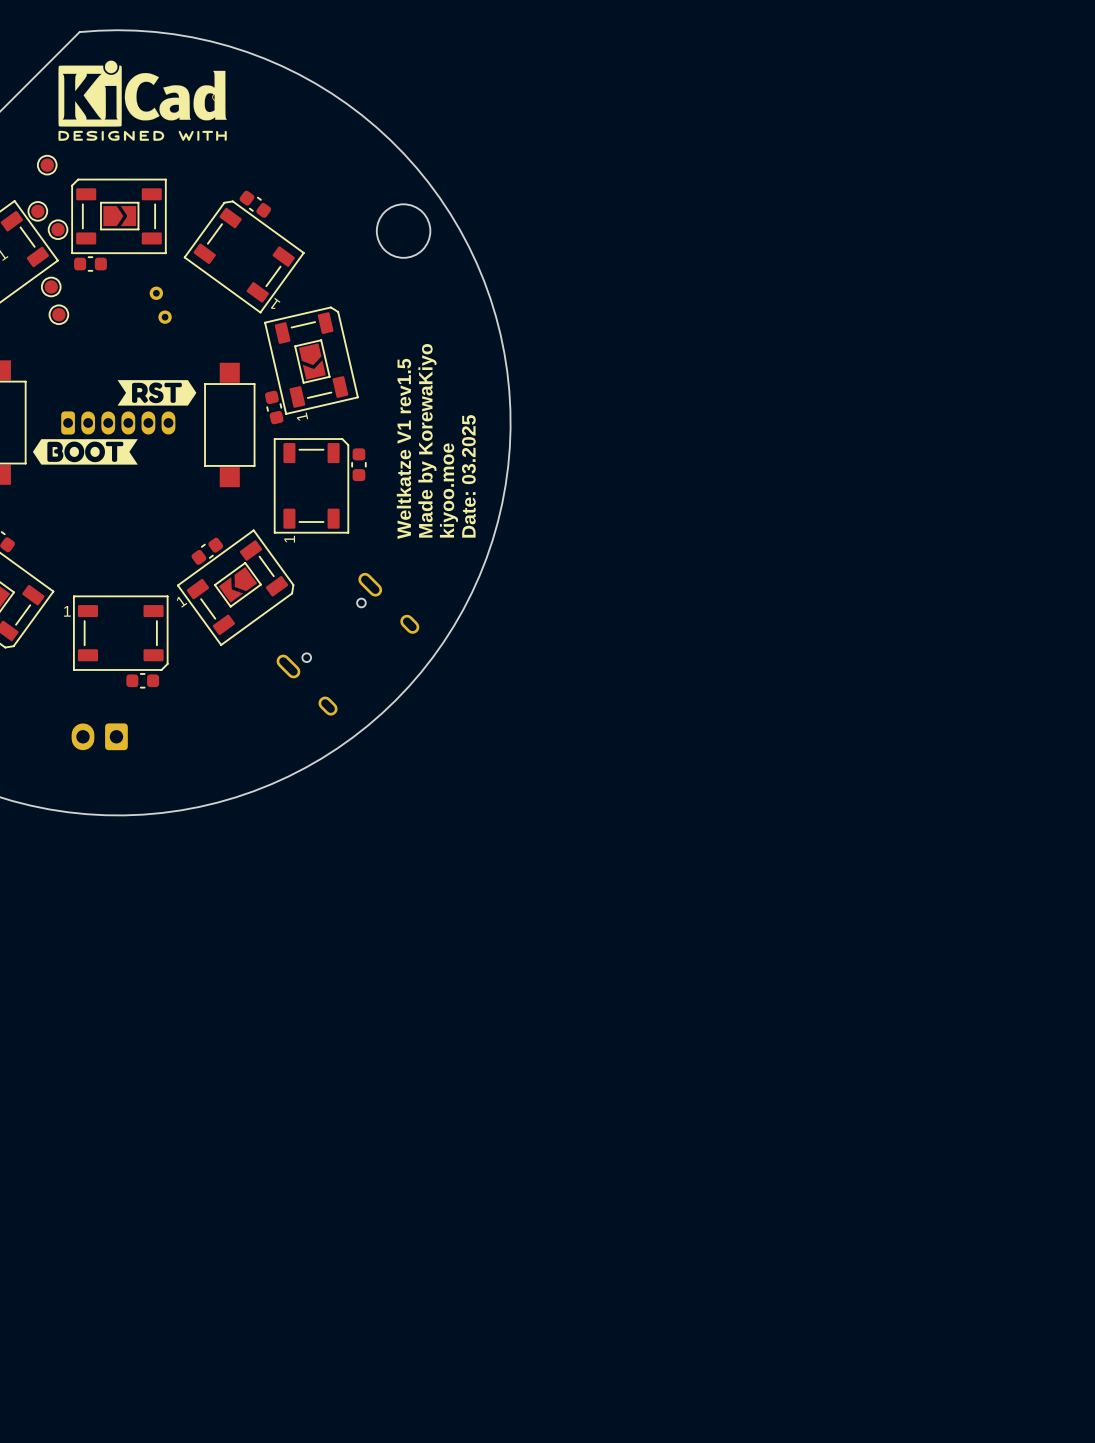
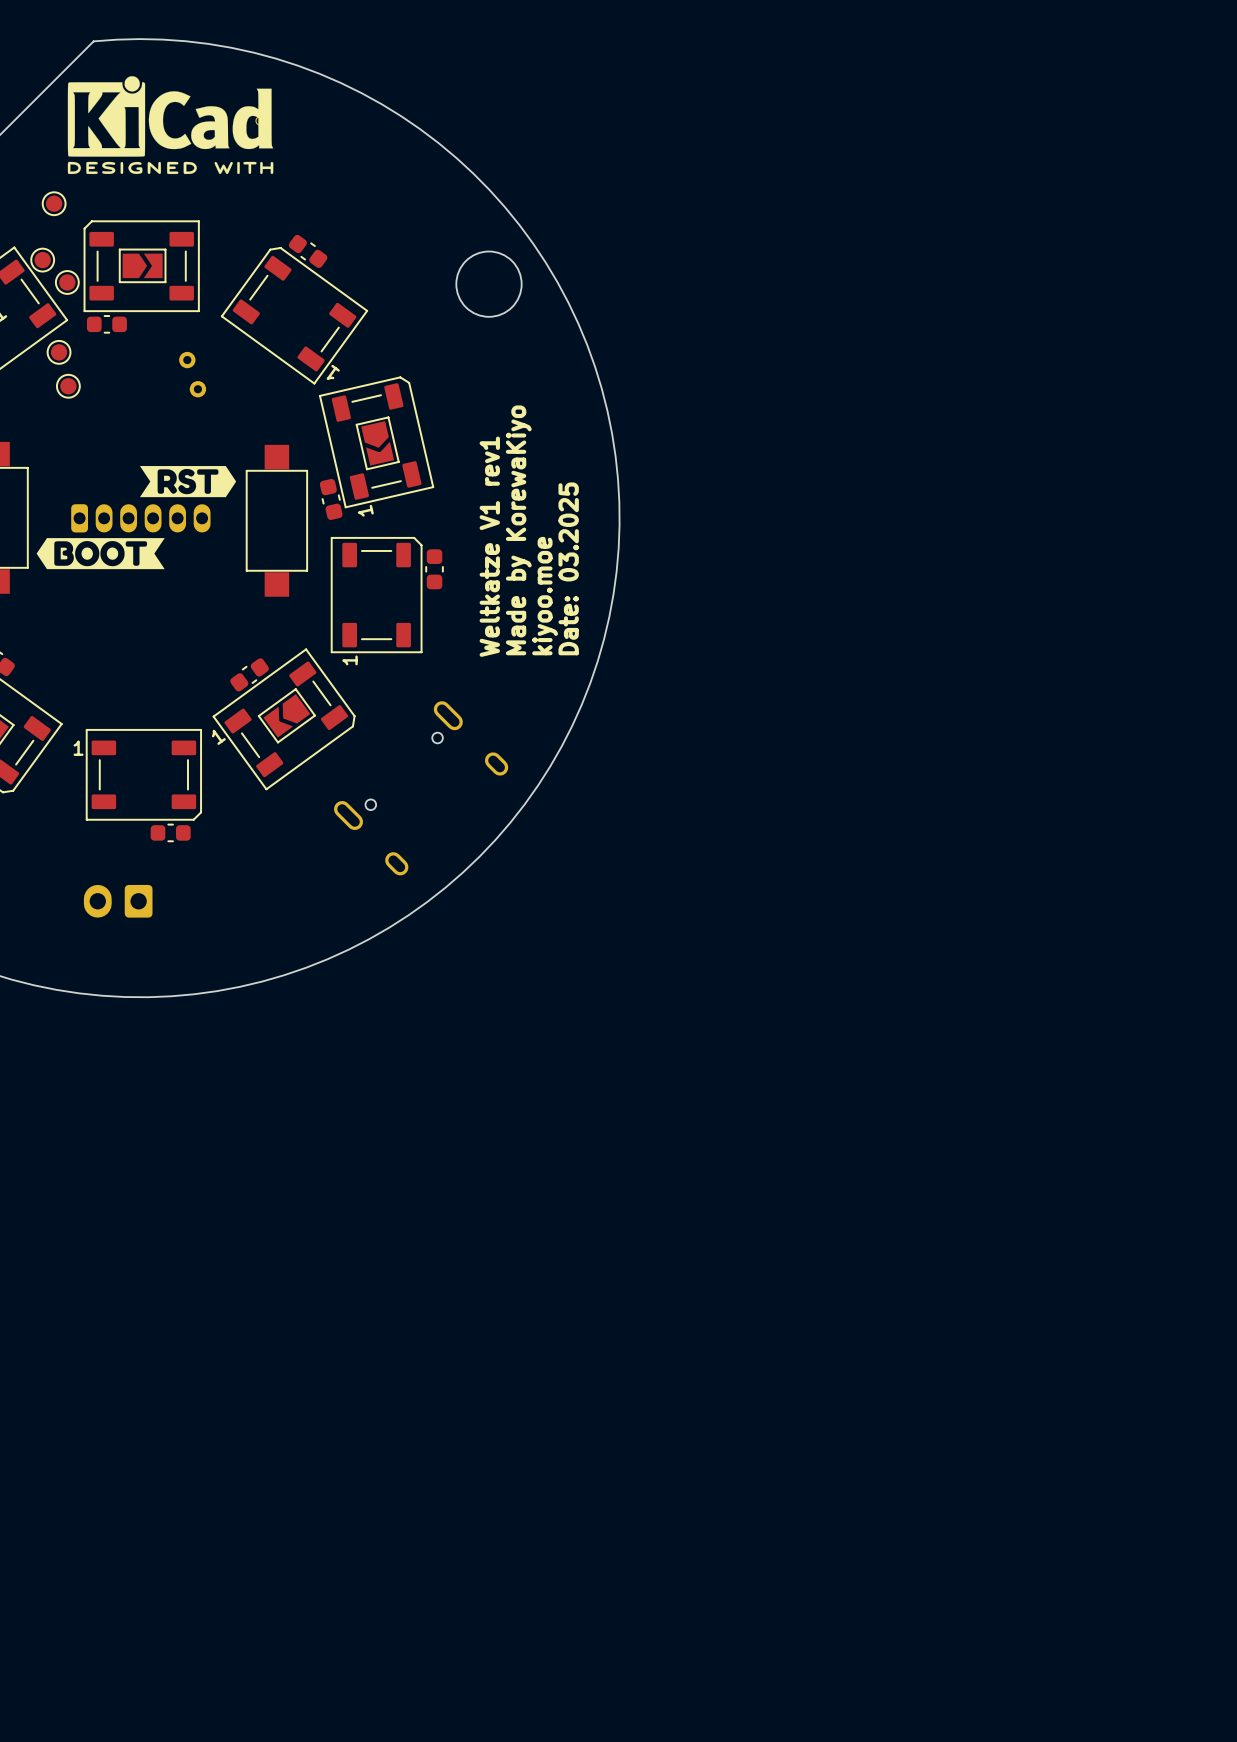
text: Weltkatze V1 rev1.5 (403, 448) -> Weltkatze V1 rev1 (489, 546)

